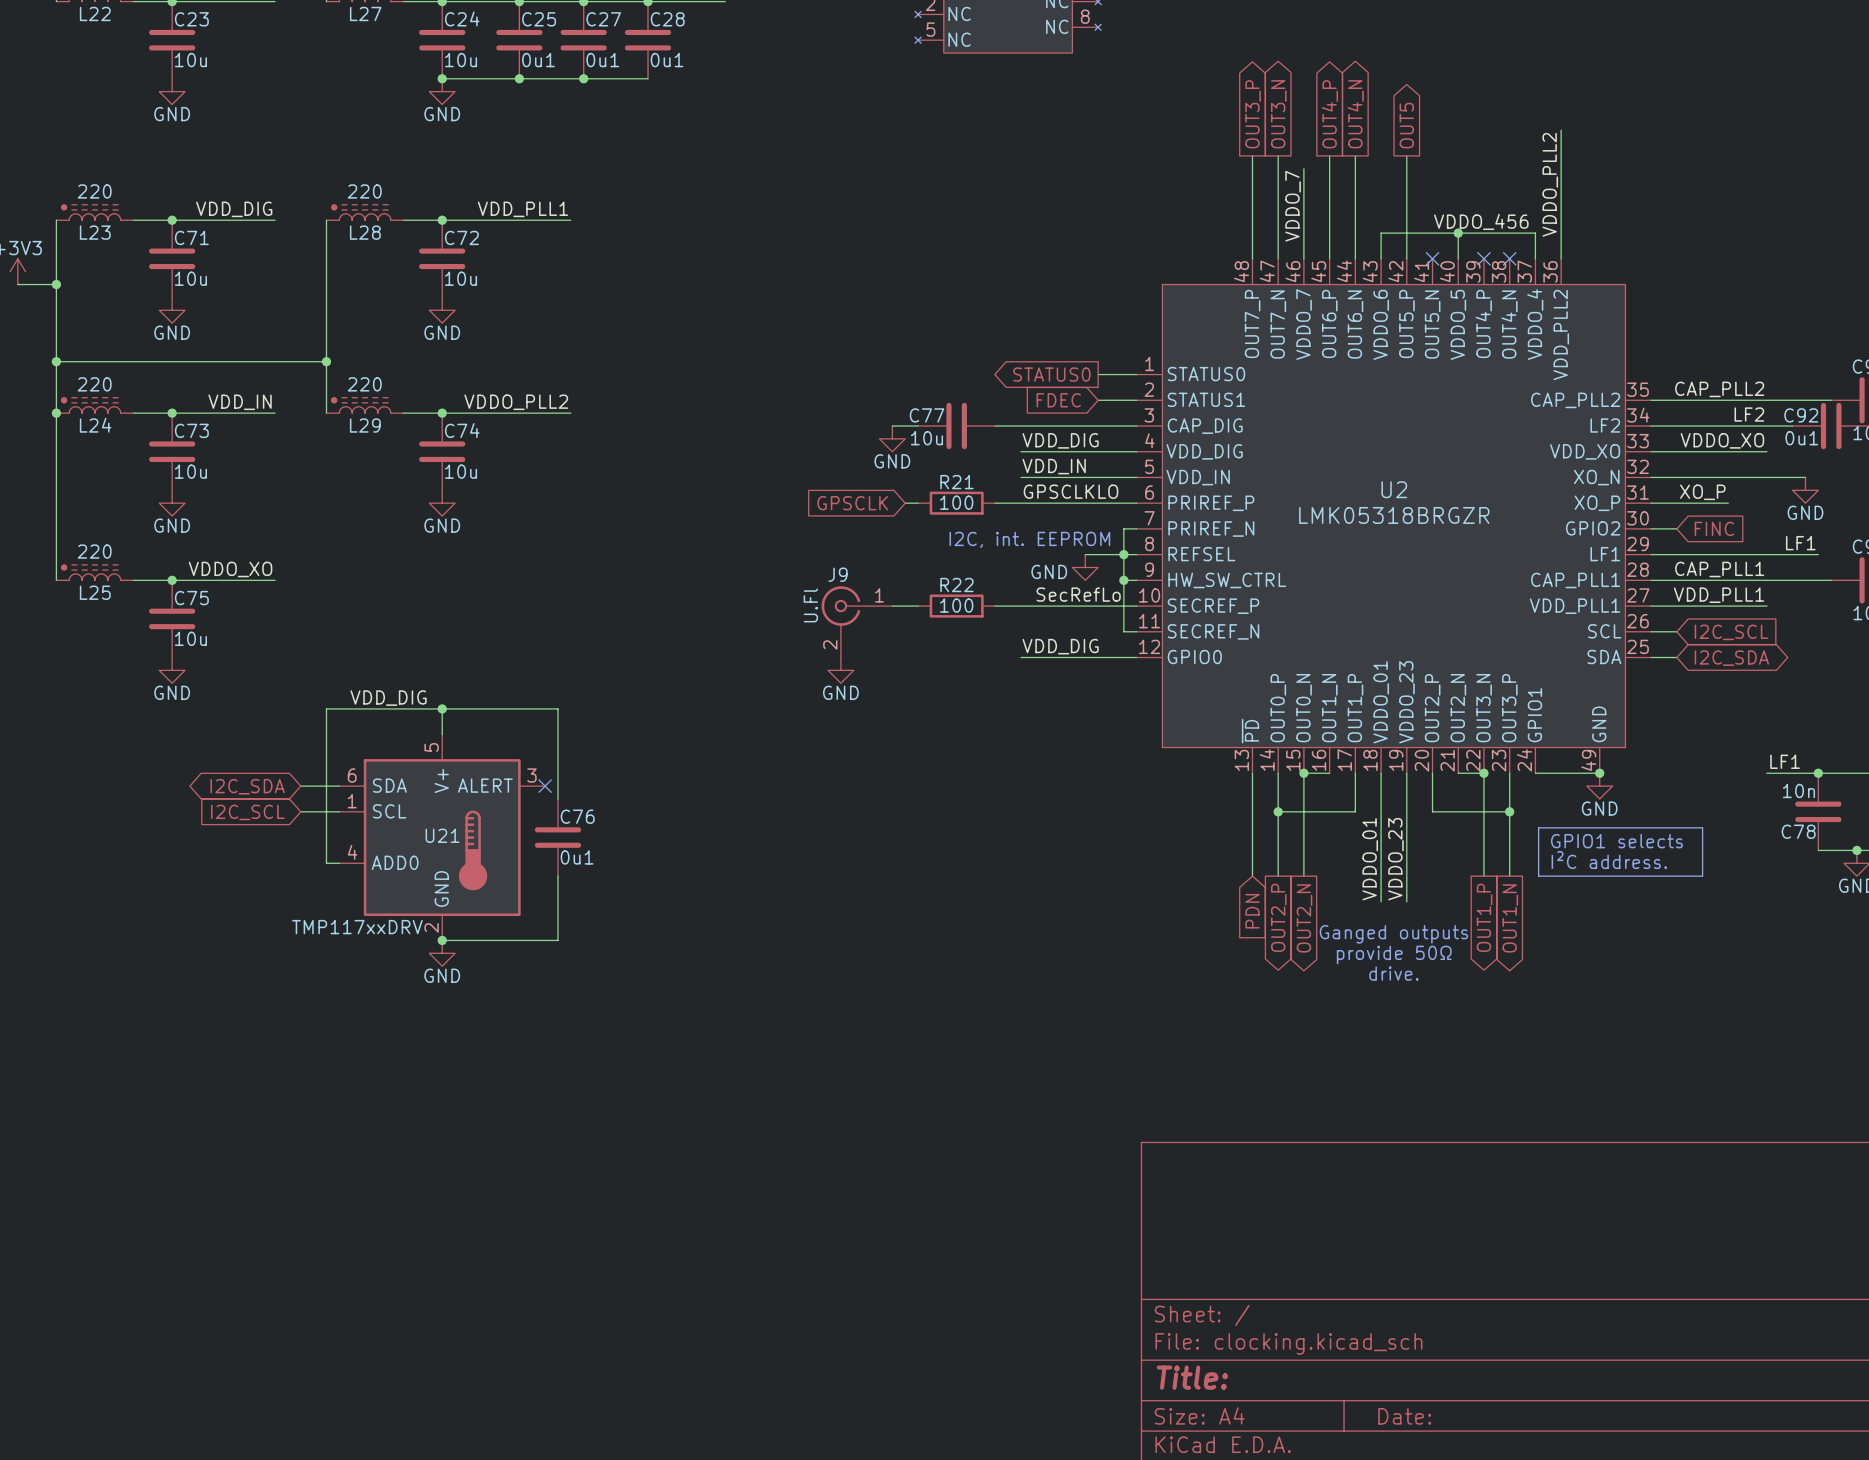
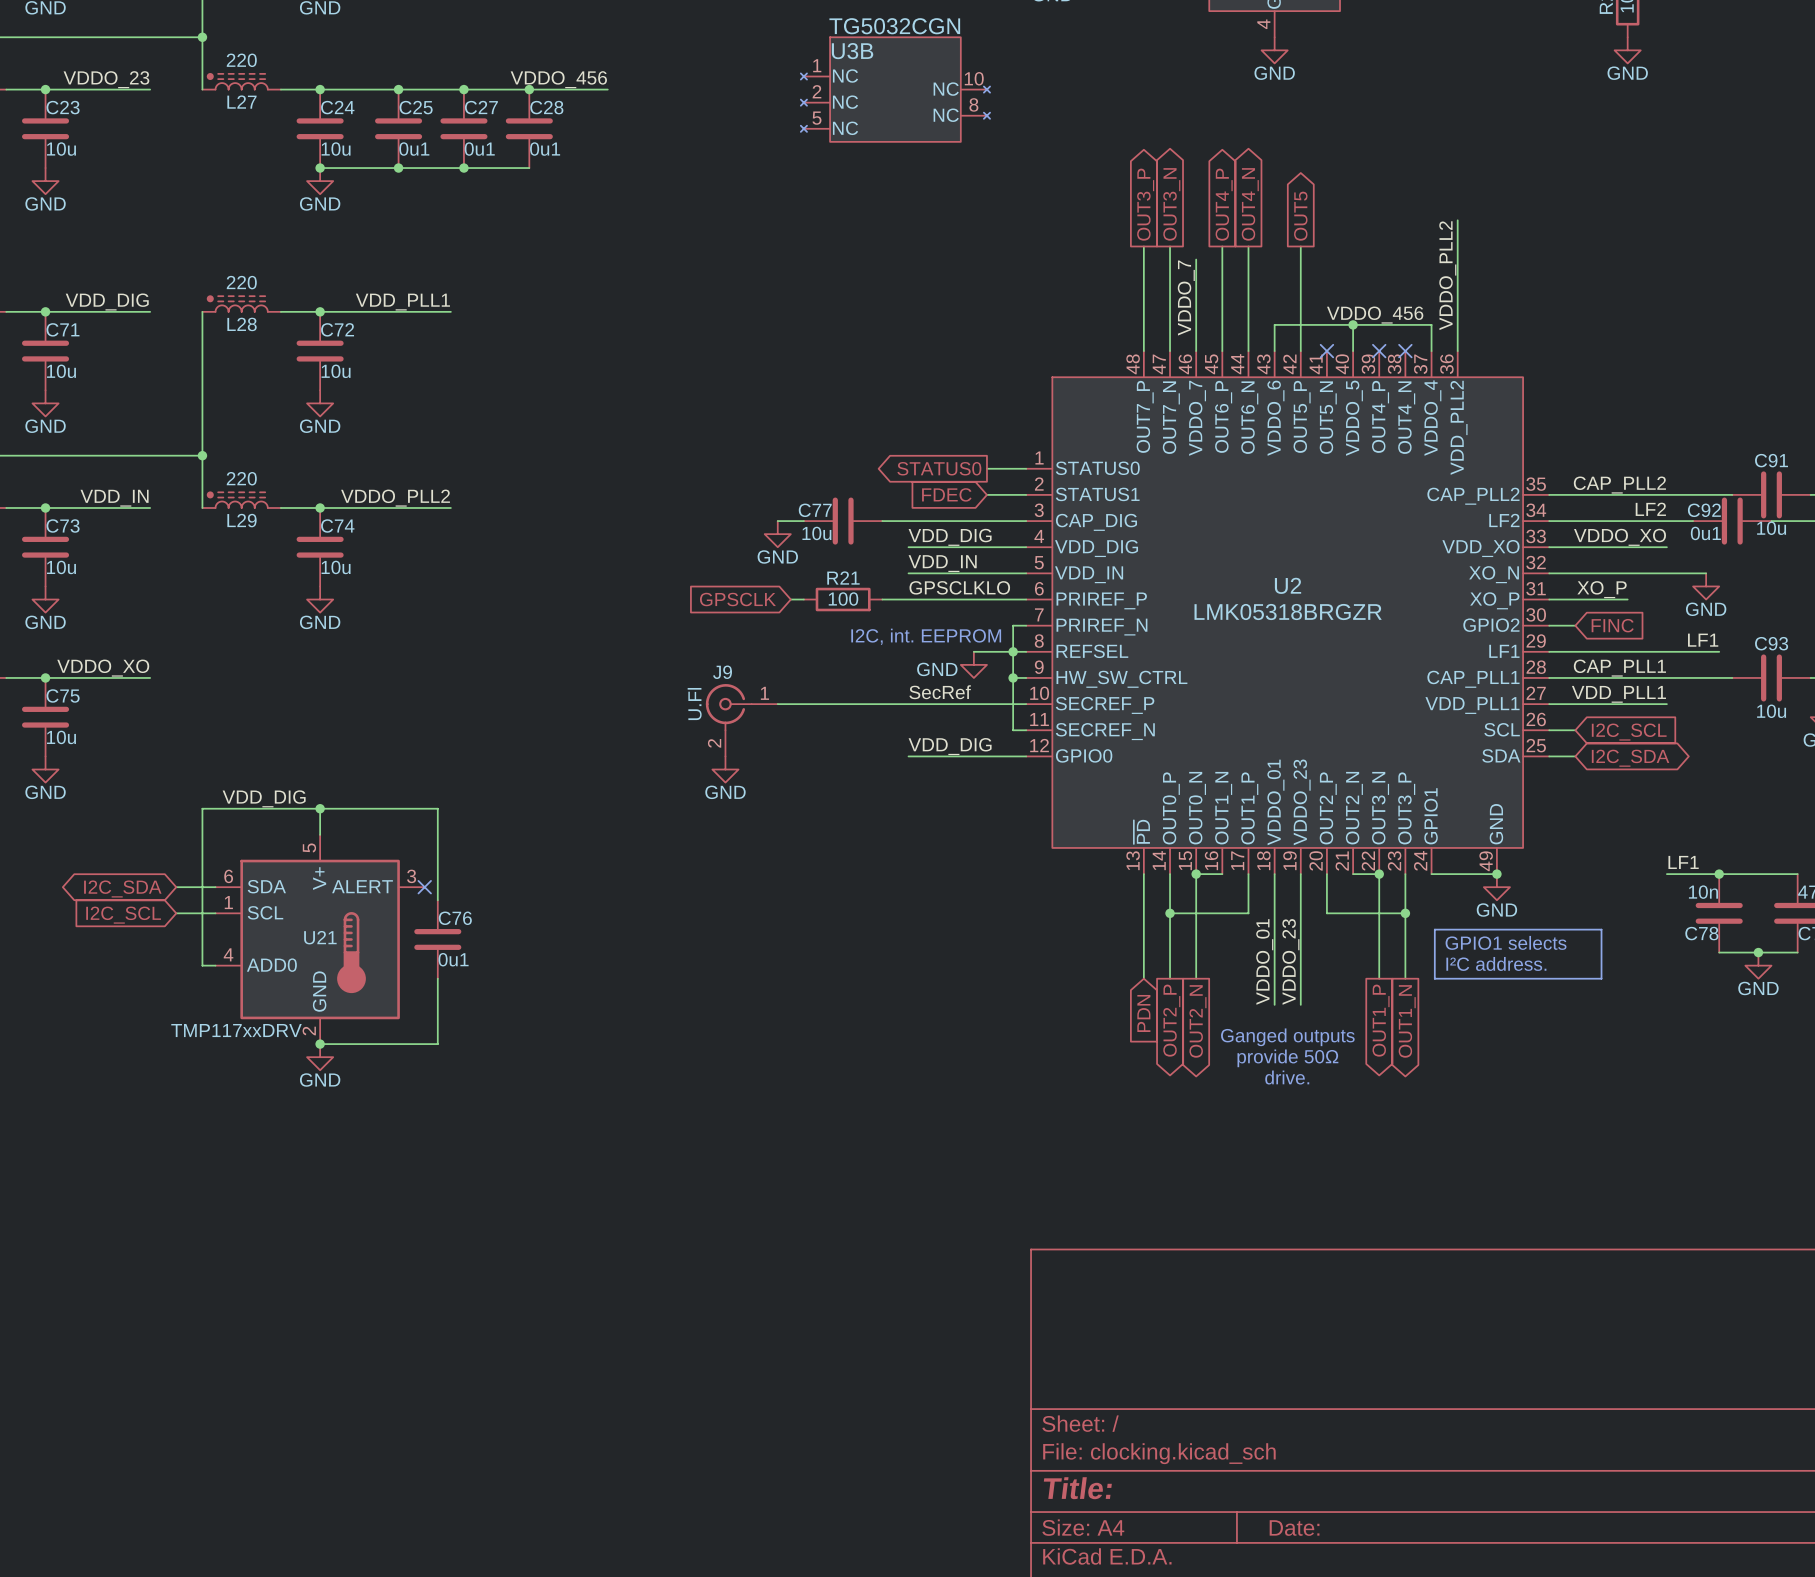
label: SecRefLo (1078, 594) -> SecRef (940, 692)
wire: none -> (803, 704) (882, 704)
R22: 100 (956, 606) -> none

